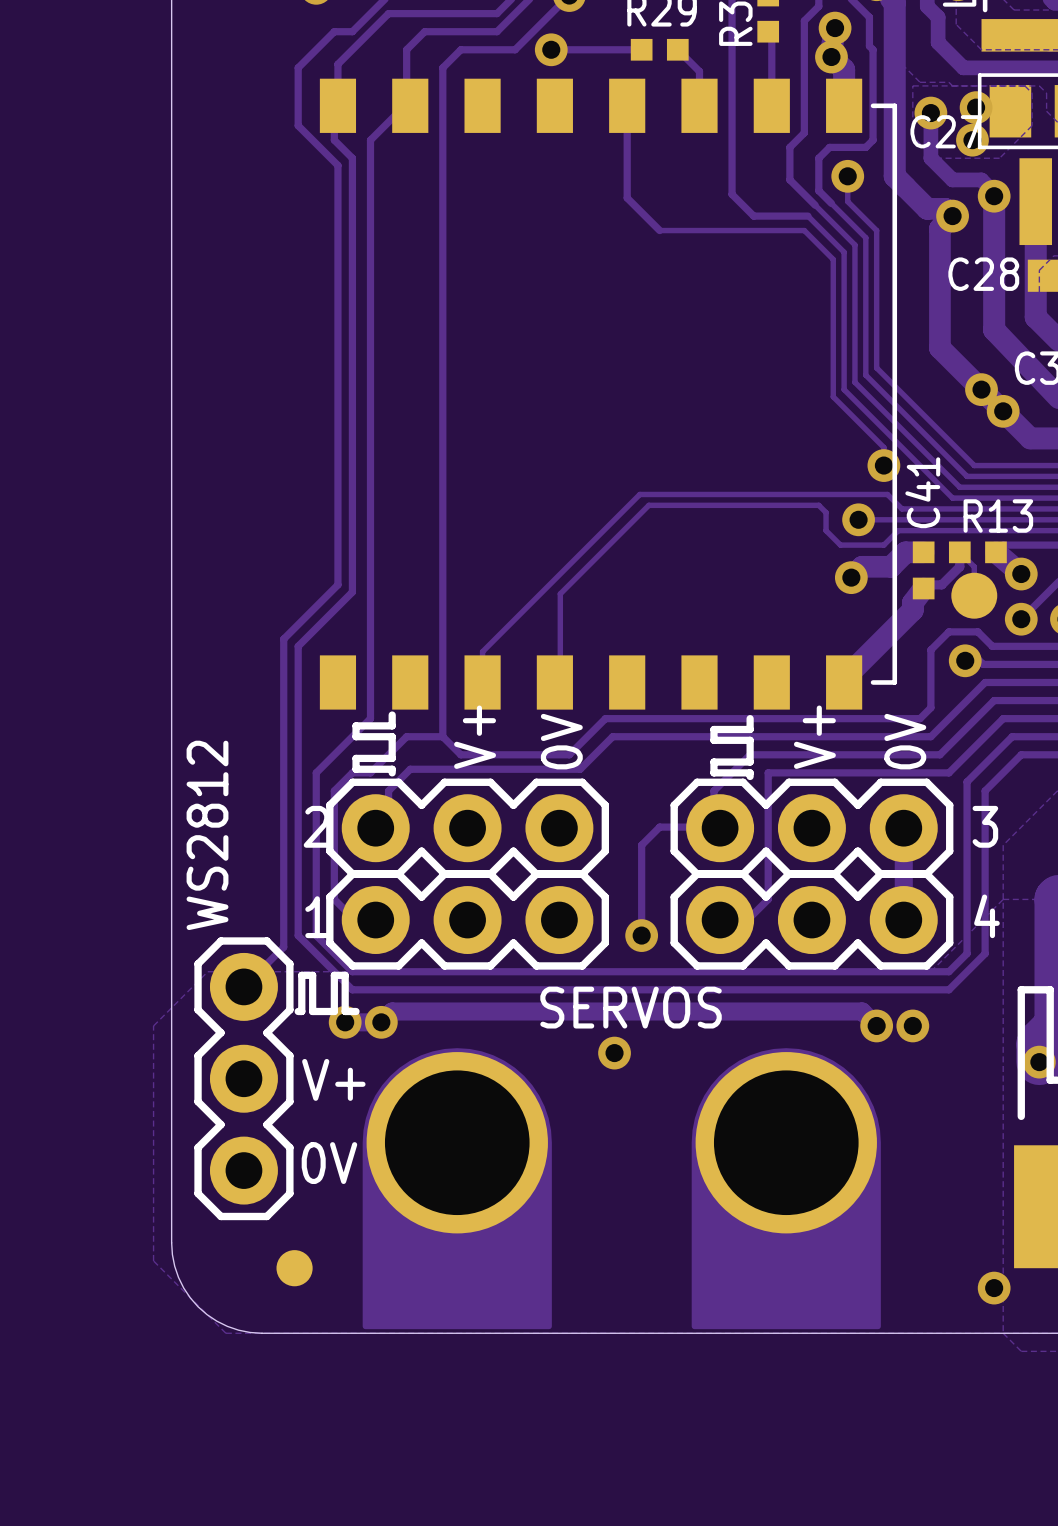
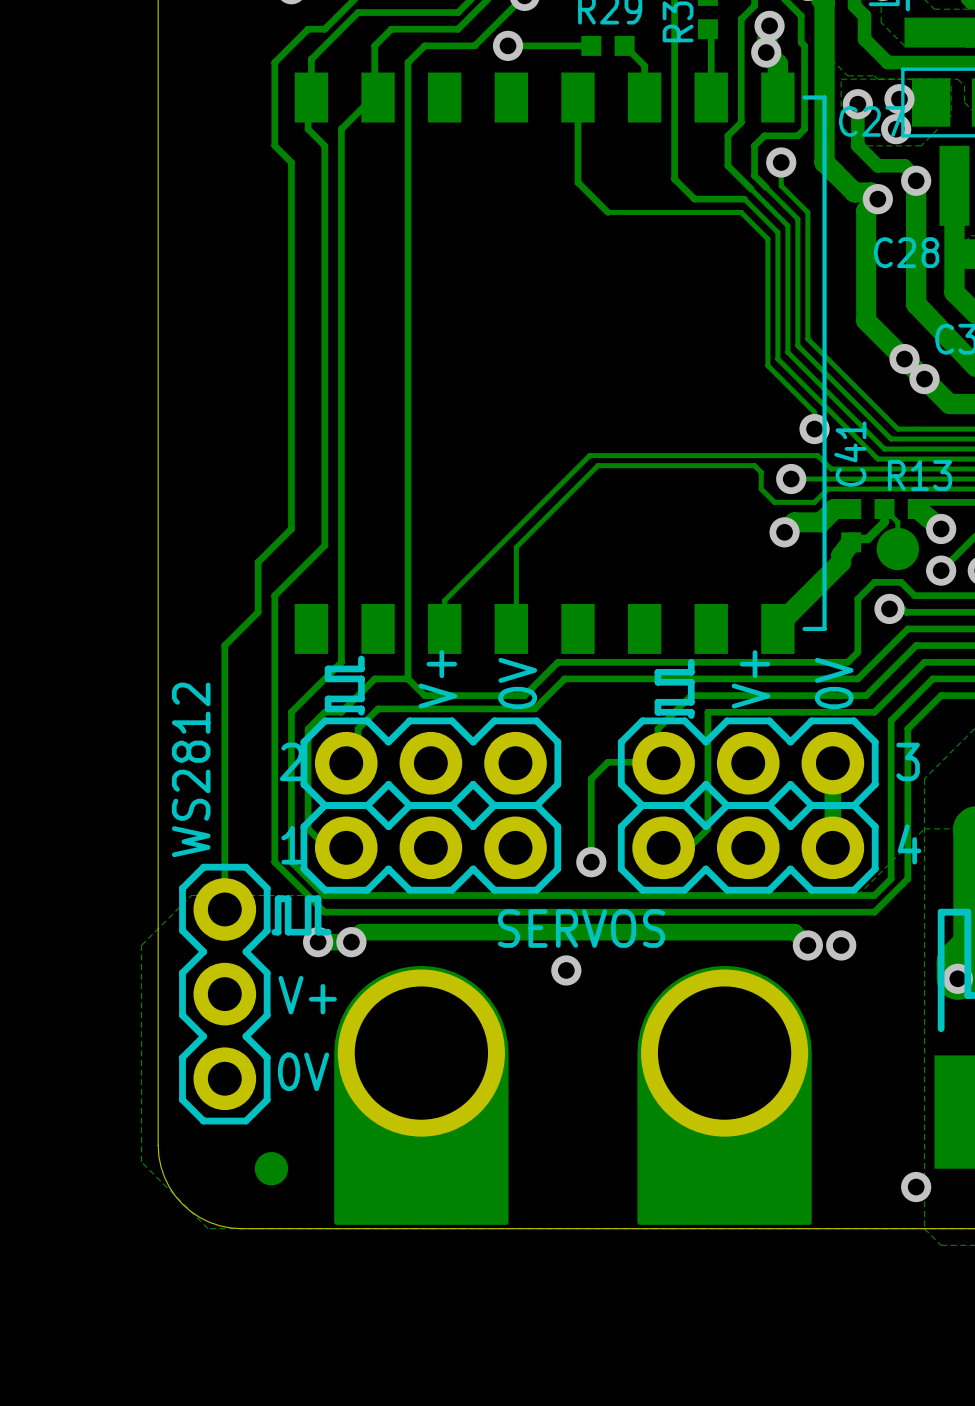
track: (298, 125) (337, 165) (337, 584) (283, 639) (283, 947) (243, 986) -> (274, 115) (274, 145) (291, 162) (291, 528) (258, 562) (258, 612) (224, 645) (224, 909)

